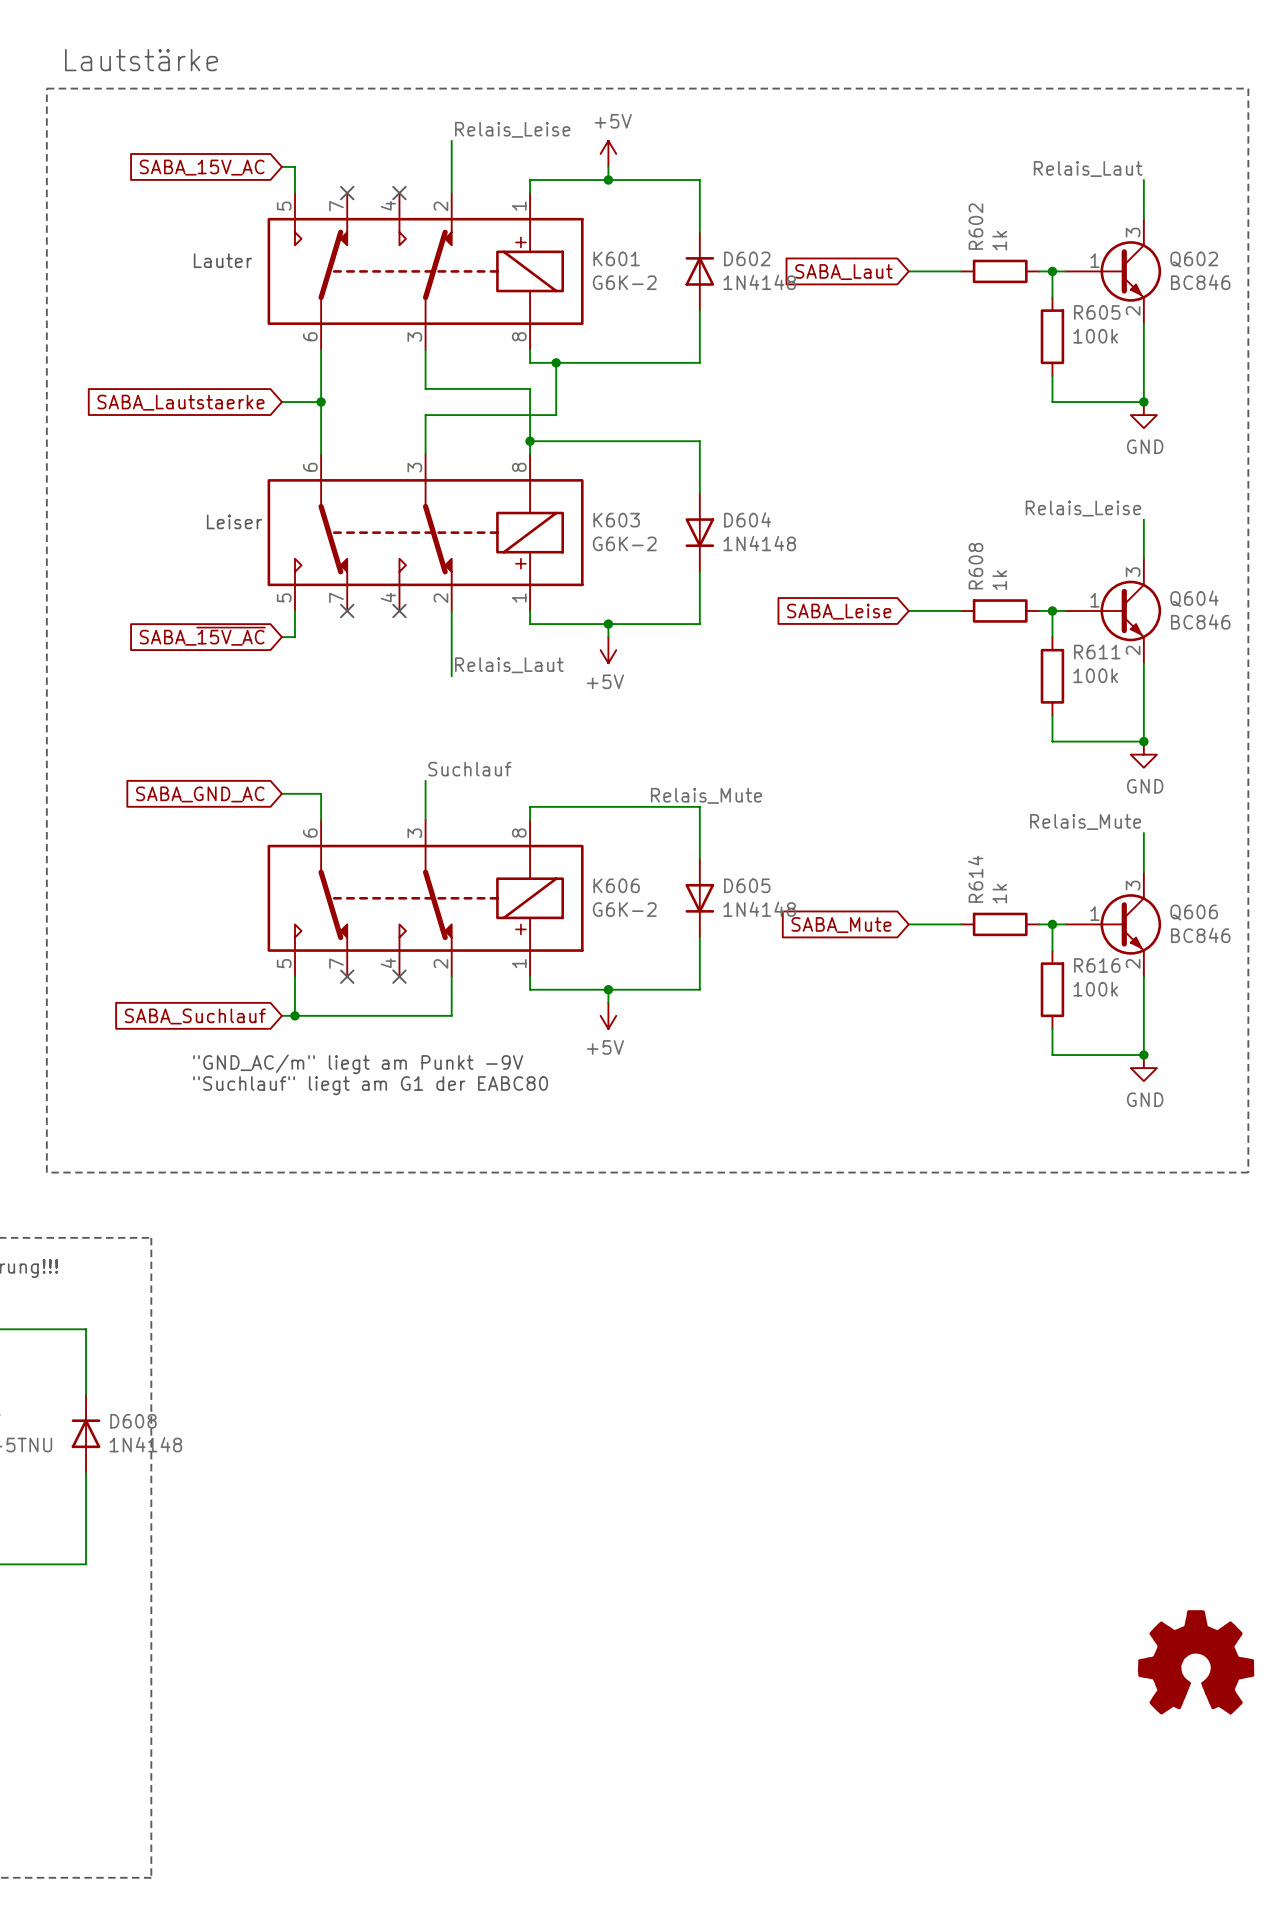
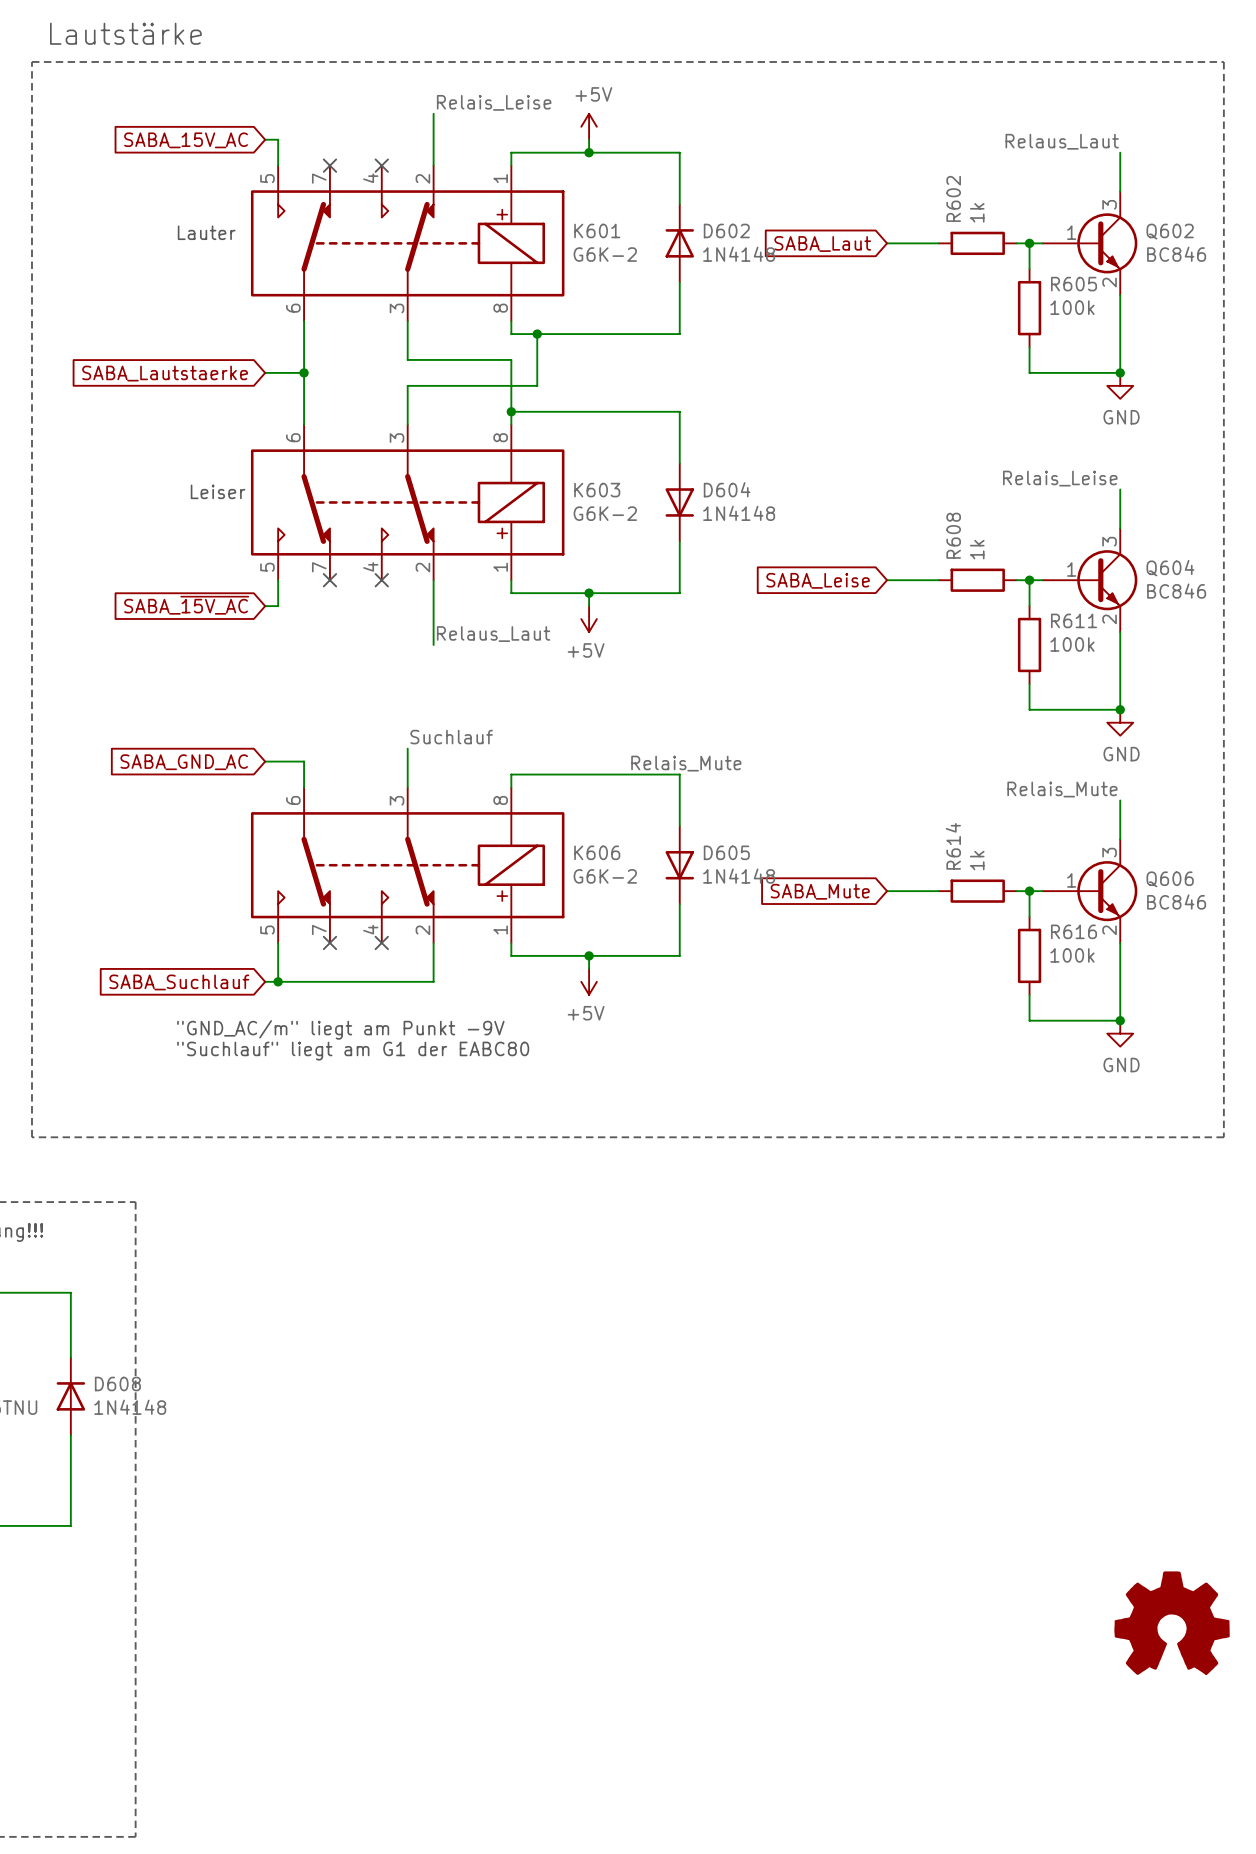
label: Relais_Laut (1088, 168) -> Relaus_Laut (1062, 141)
label: Relais_Laut (509, 665) -> Relaus_Laut (493, 634)

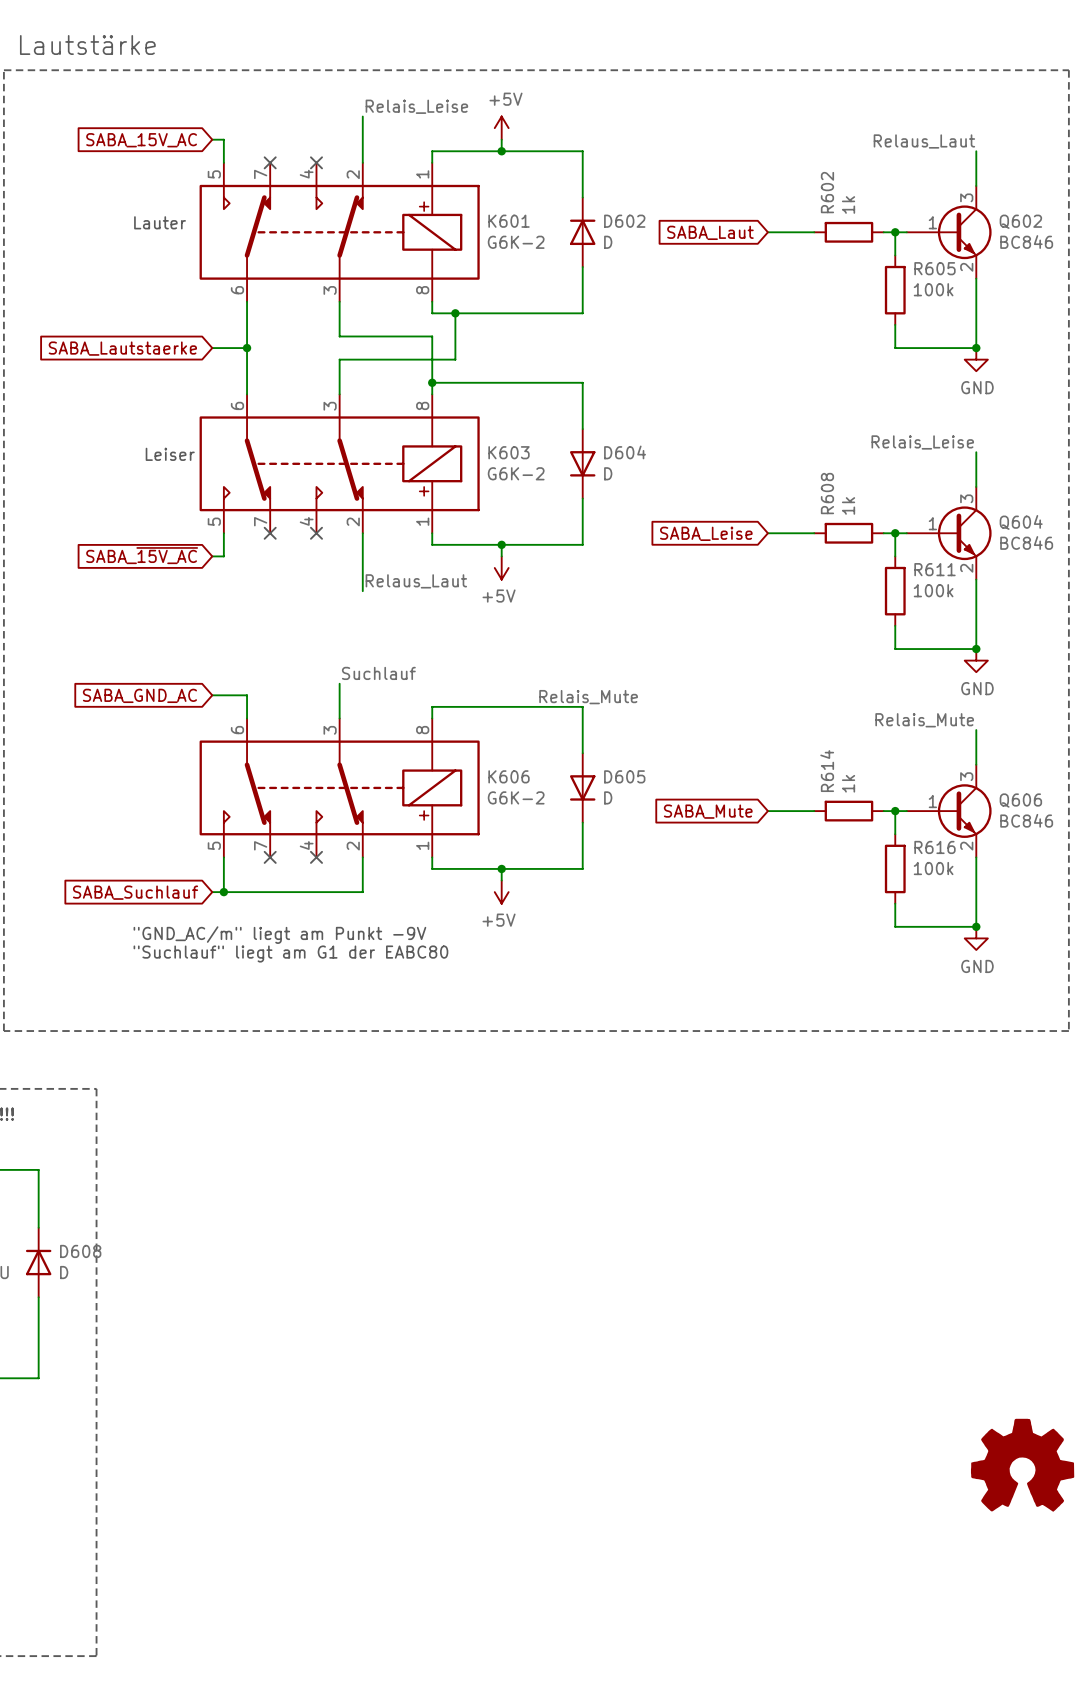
D602 value: 1N4148 (739, 254) -> D (608, 242)
D604 value: 1N4148 (739, 513) -> D (608, 473)
D605 value: 1N4148 (739, 876) -> D (608, 797)
D608 value: 1N4148 (130, 1407) -> D (64, 1272)

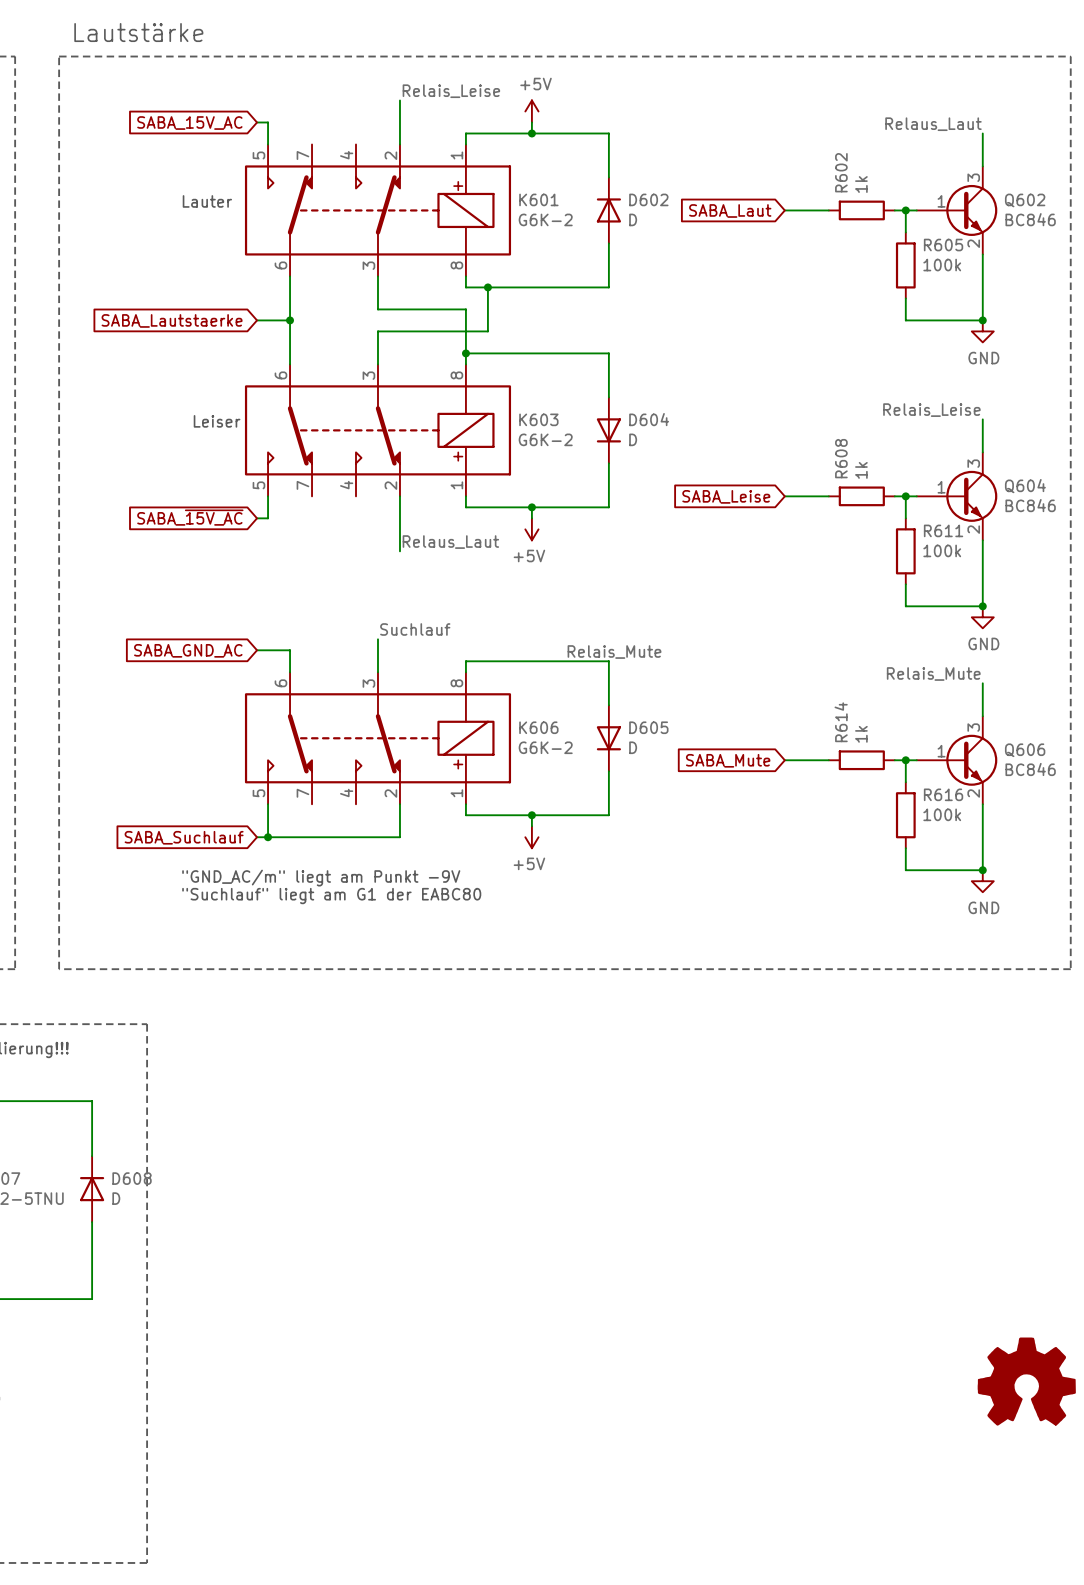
no-connect mark: (270, 162) -> none
no-connect mark: (316, 162) -> none
no-connect mark: (270, 533) -> none
no-connect mark: (316, 533) -> none
no-connect mark: (270, 857) -> none
no-connect mark: (316, 857) -> none

